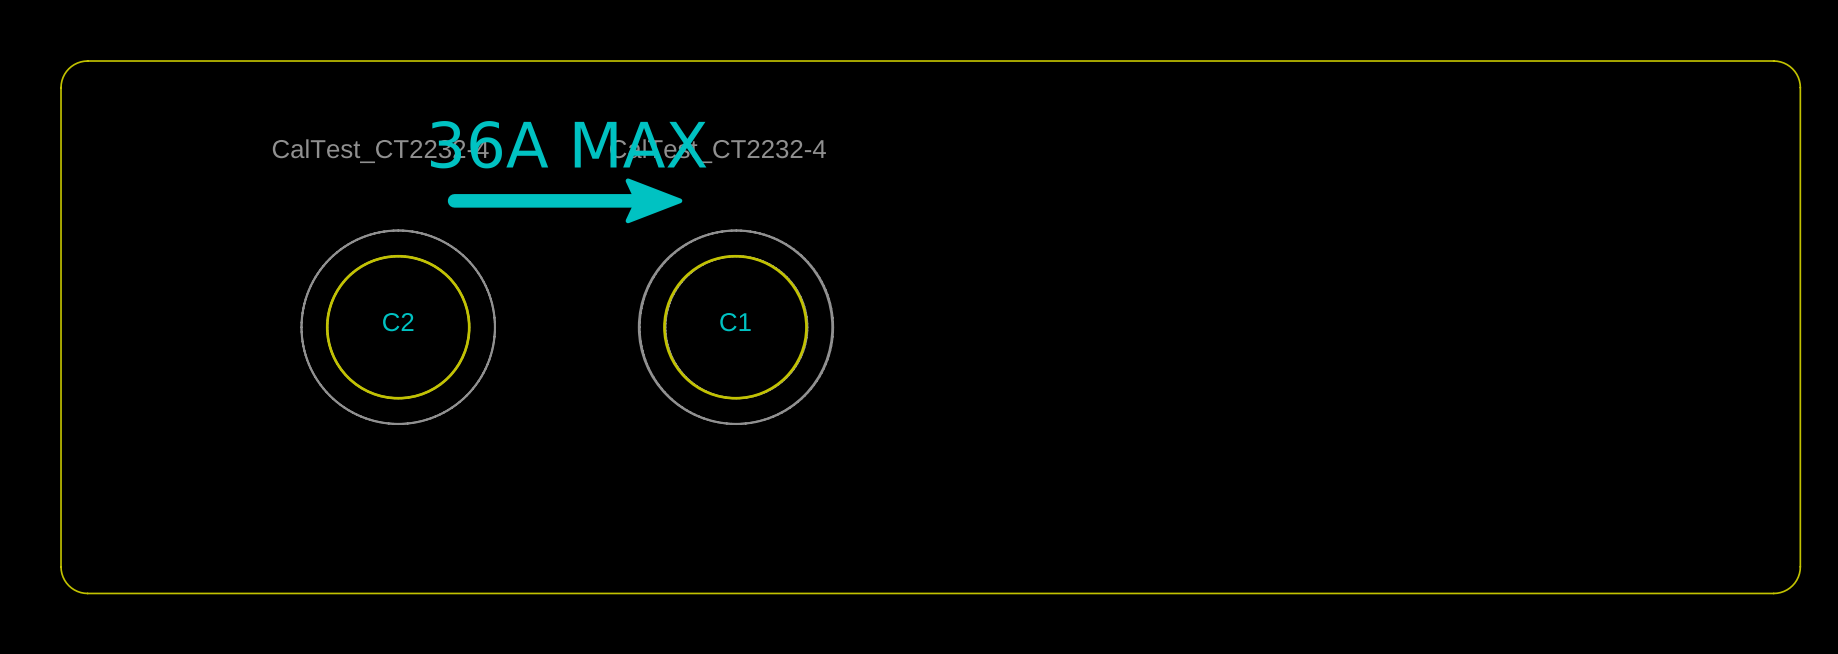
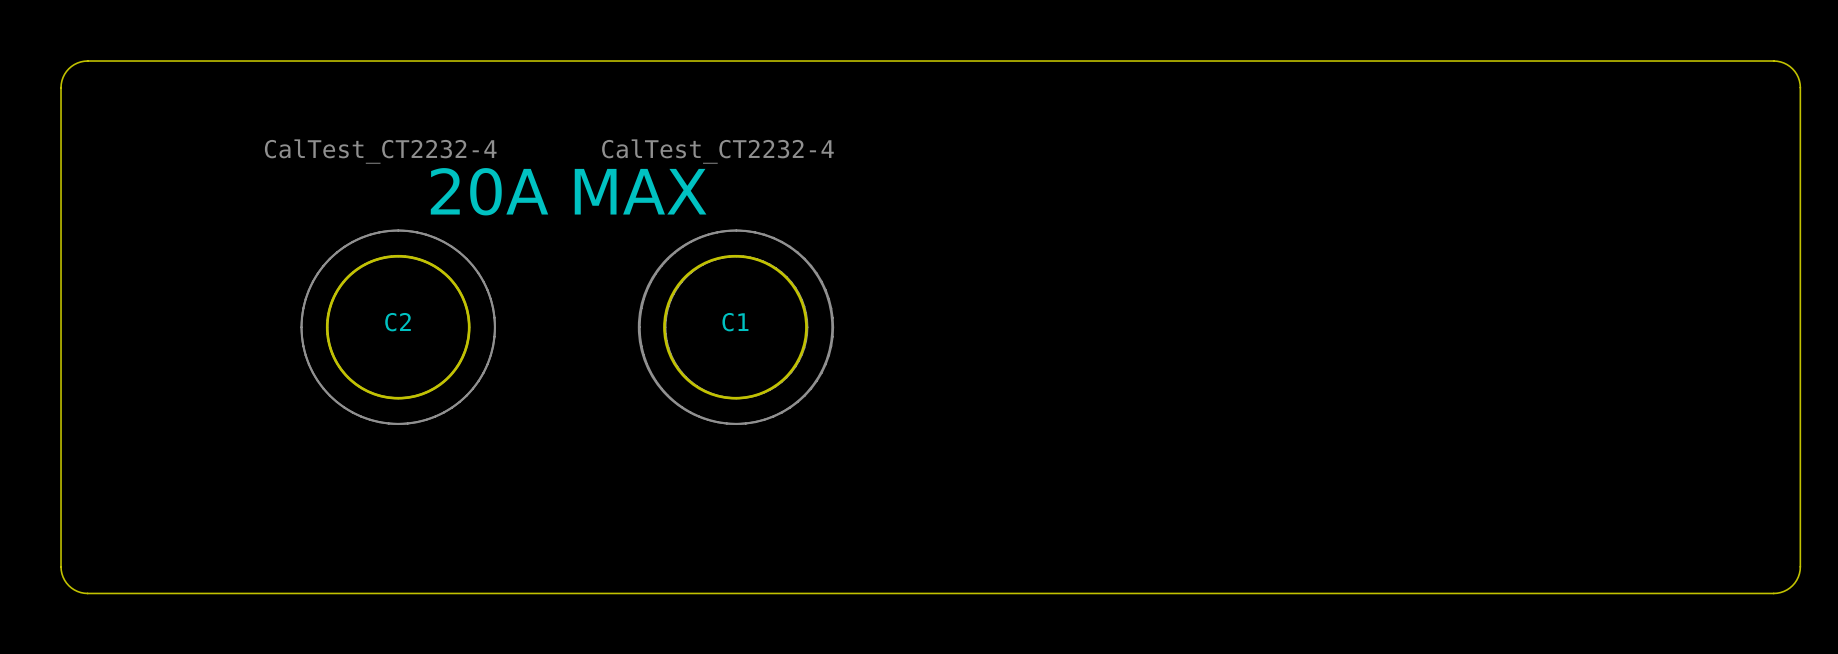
drawing: [300, 121, 835, 426] -> none
drawing: none -> [300, 168, 835, 426]

